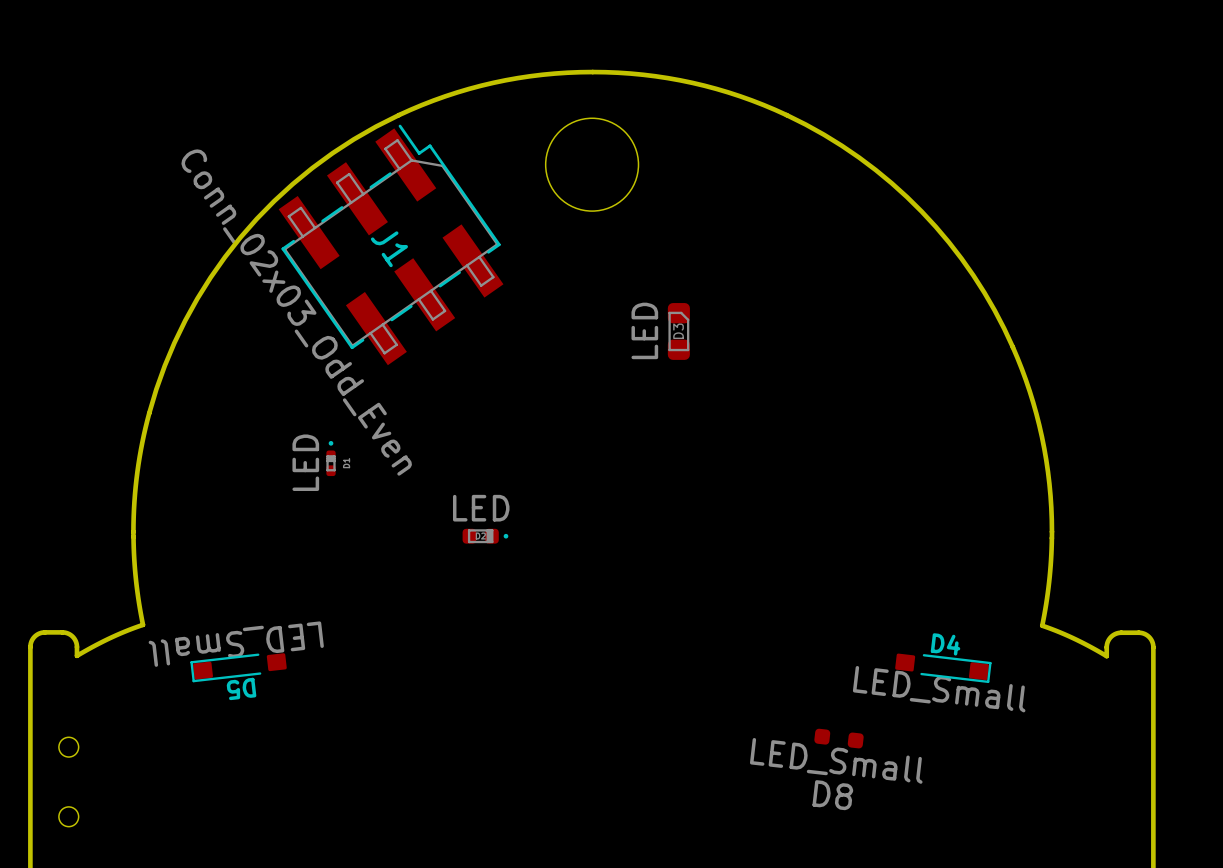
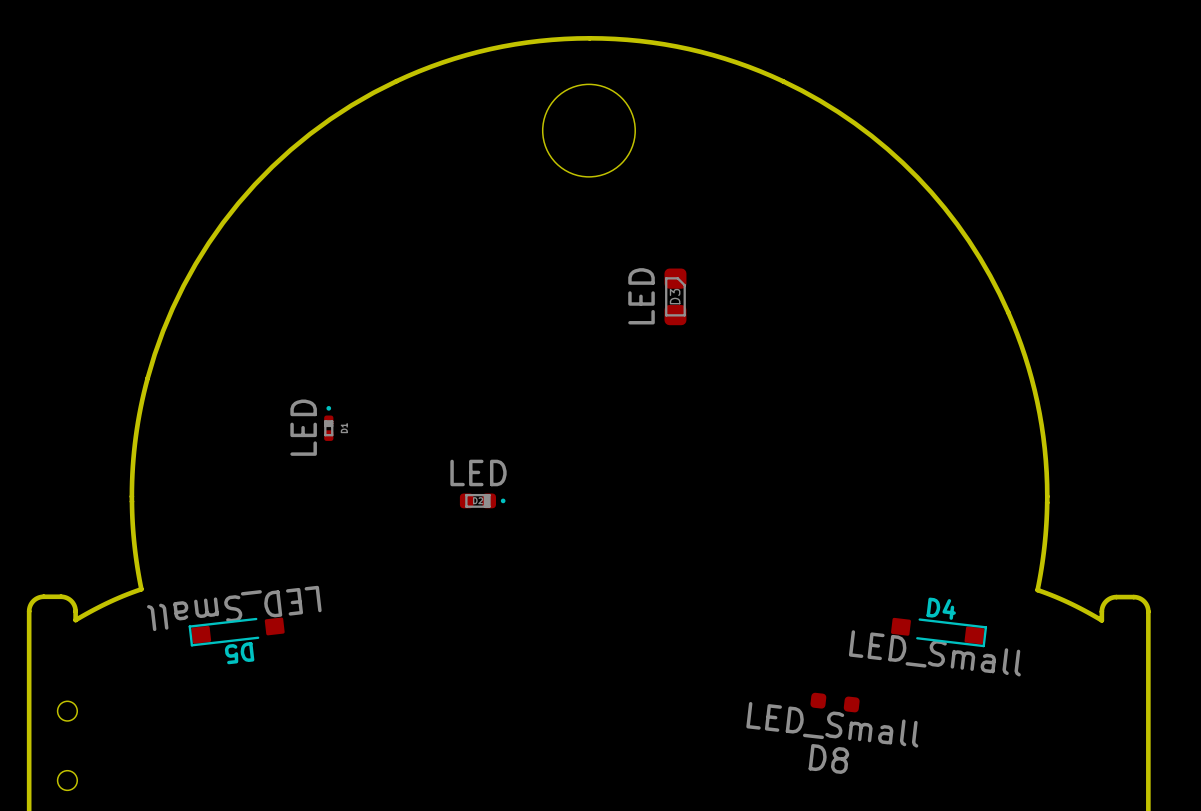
J1: Conn_02x03_Odd_Even (391, 244) -> none

